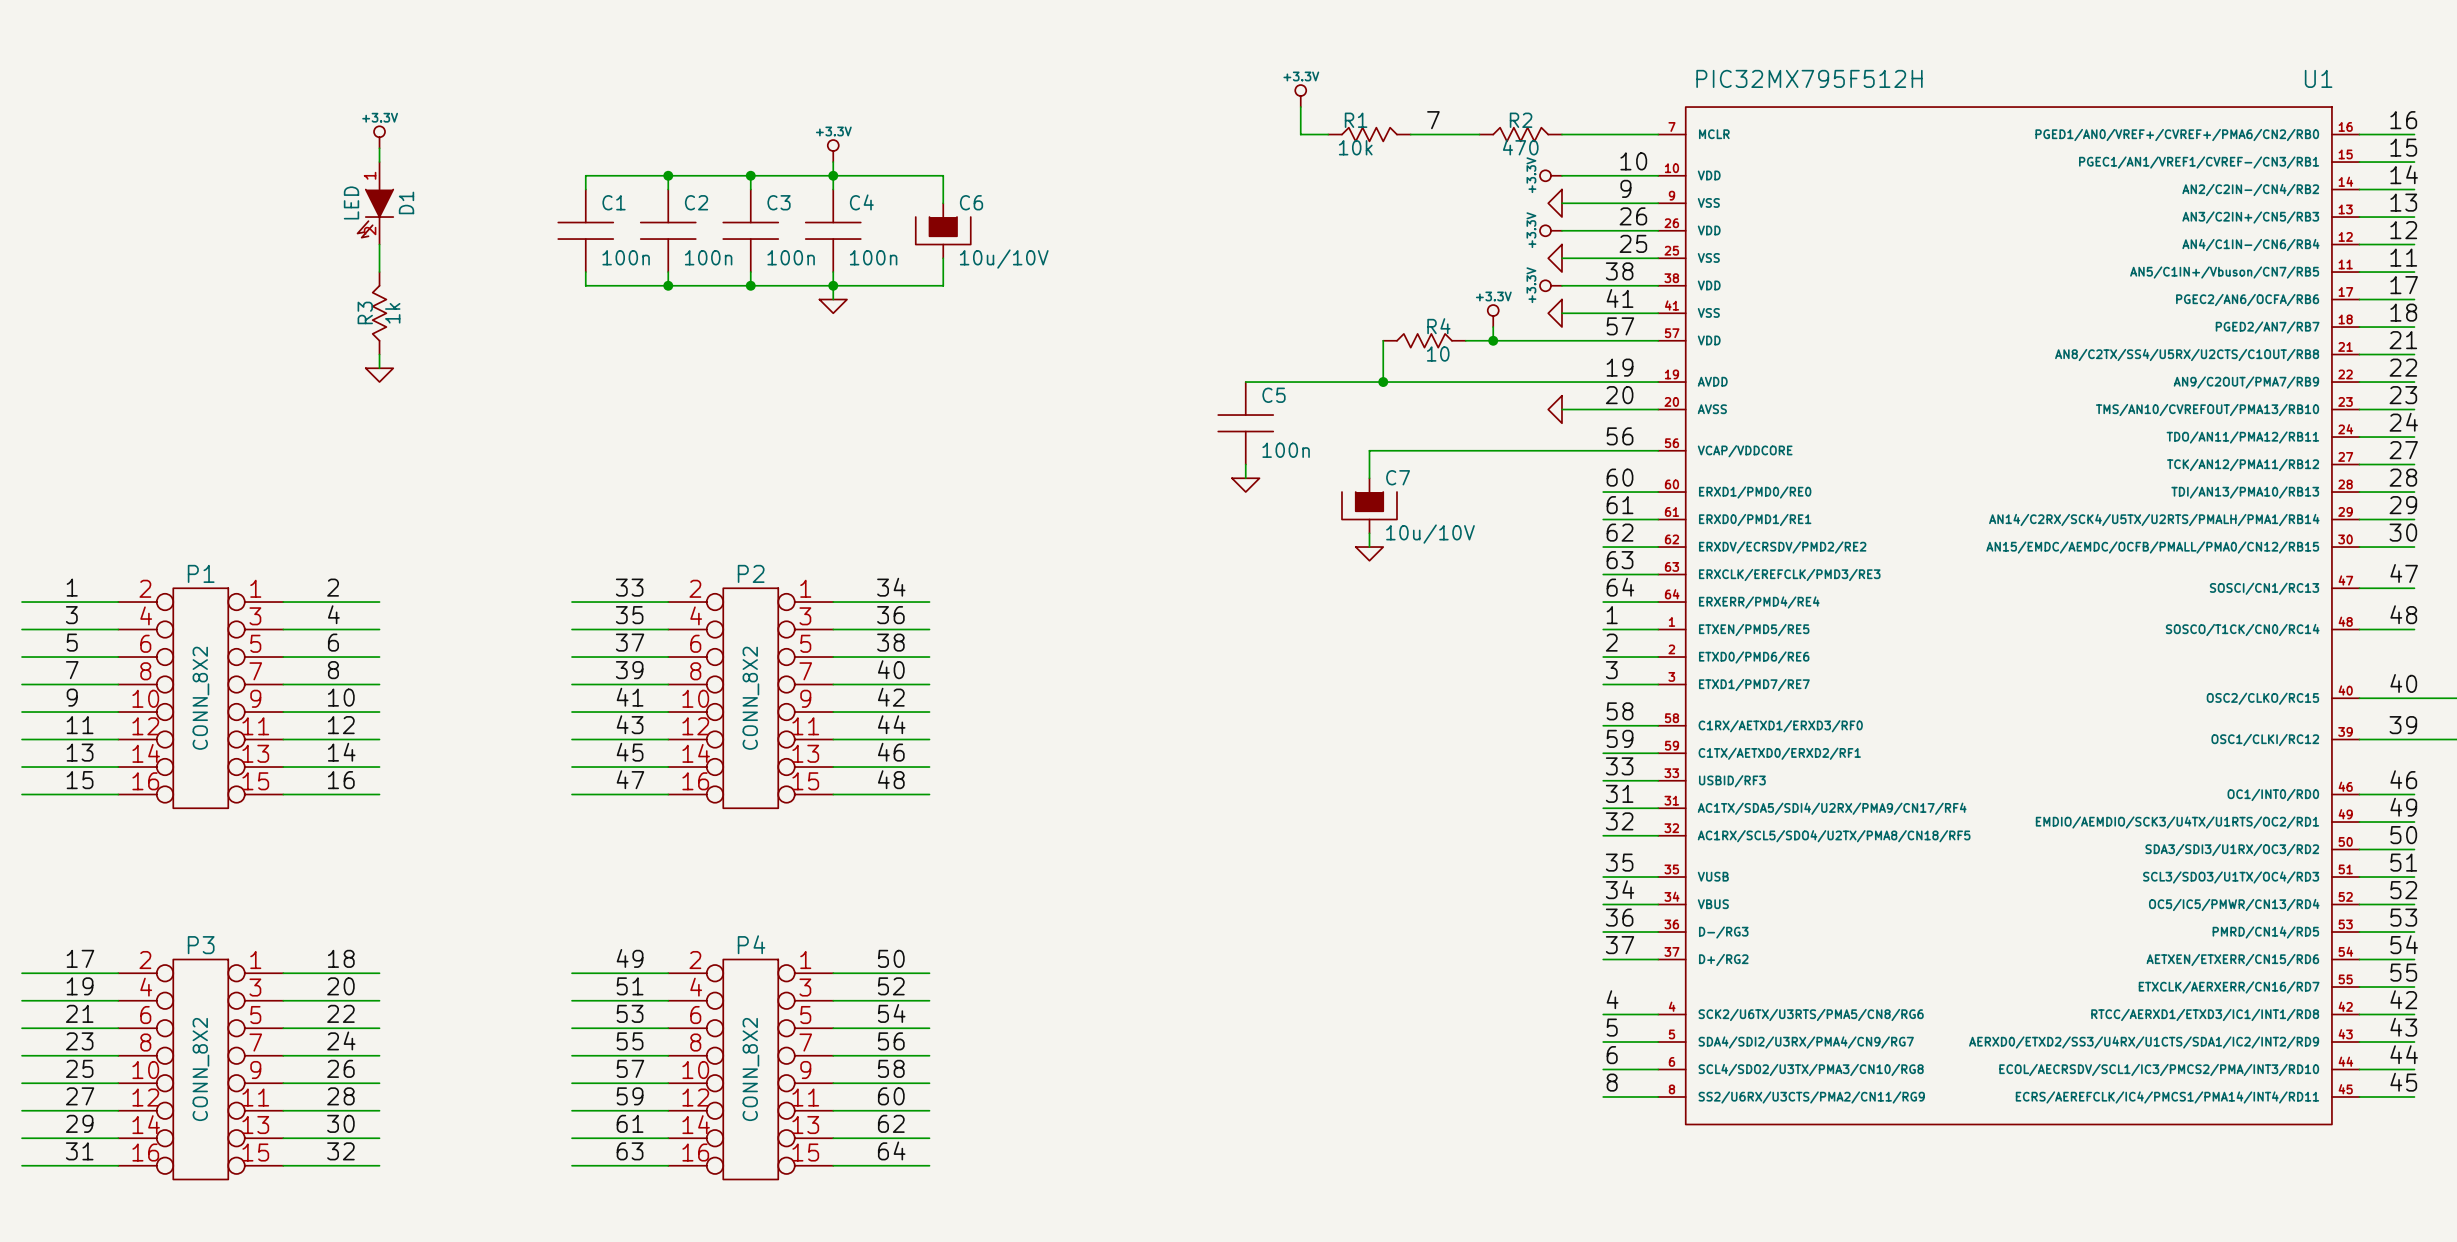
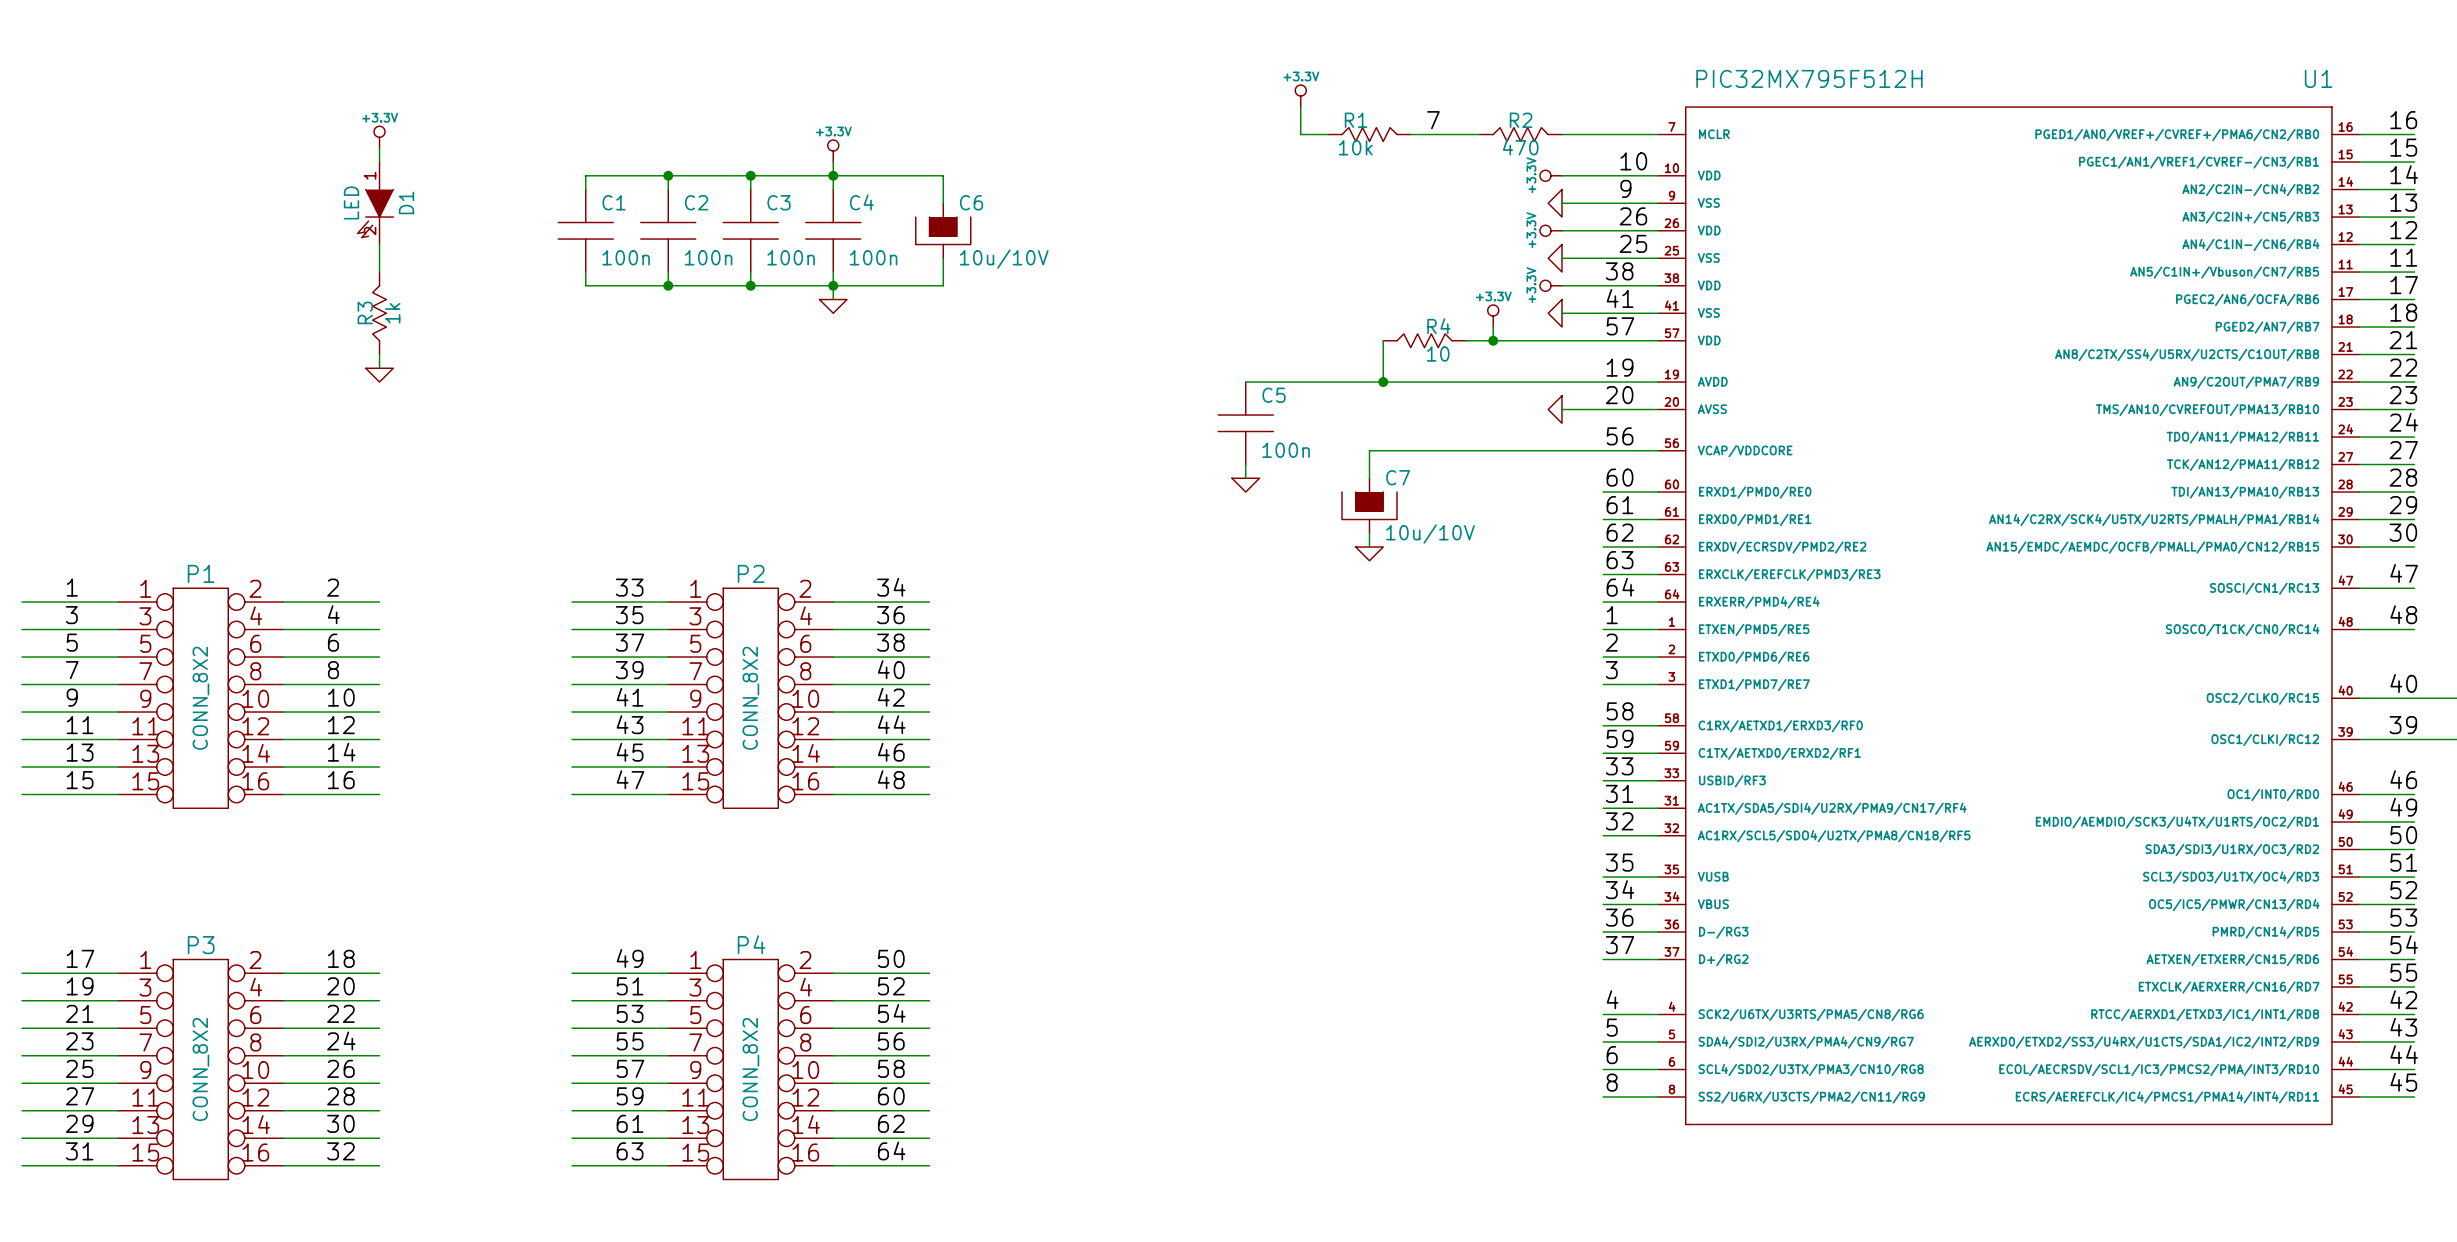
P1 flip: as is (200, 698) -> left-right (200, 698)
P2 flip: as is (750, 698) -> left-right (750, 698)
P3 flip: as is (200, 1069) -> left-right (200, 1069)
P4 flip: as is (750, 1069) -> left-right (750, 1069)

